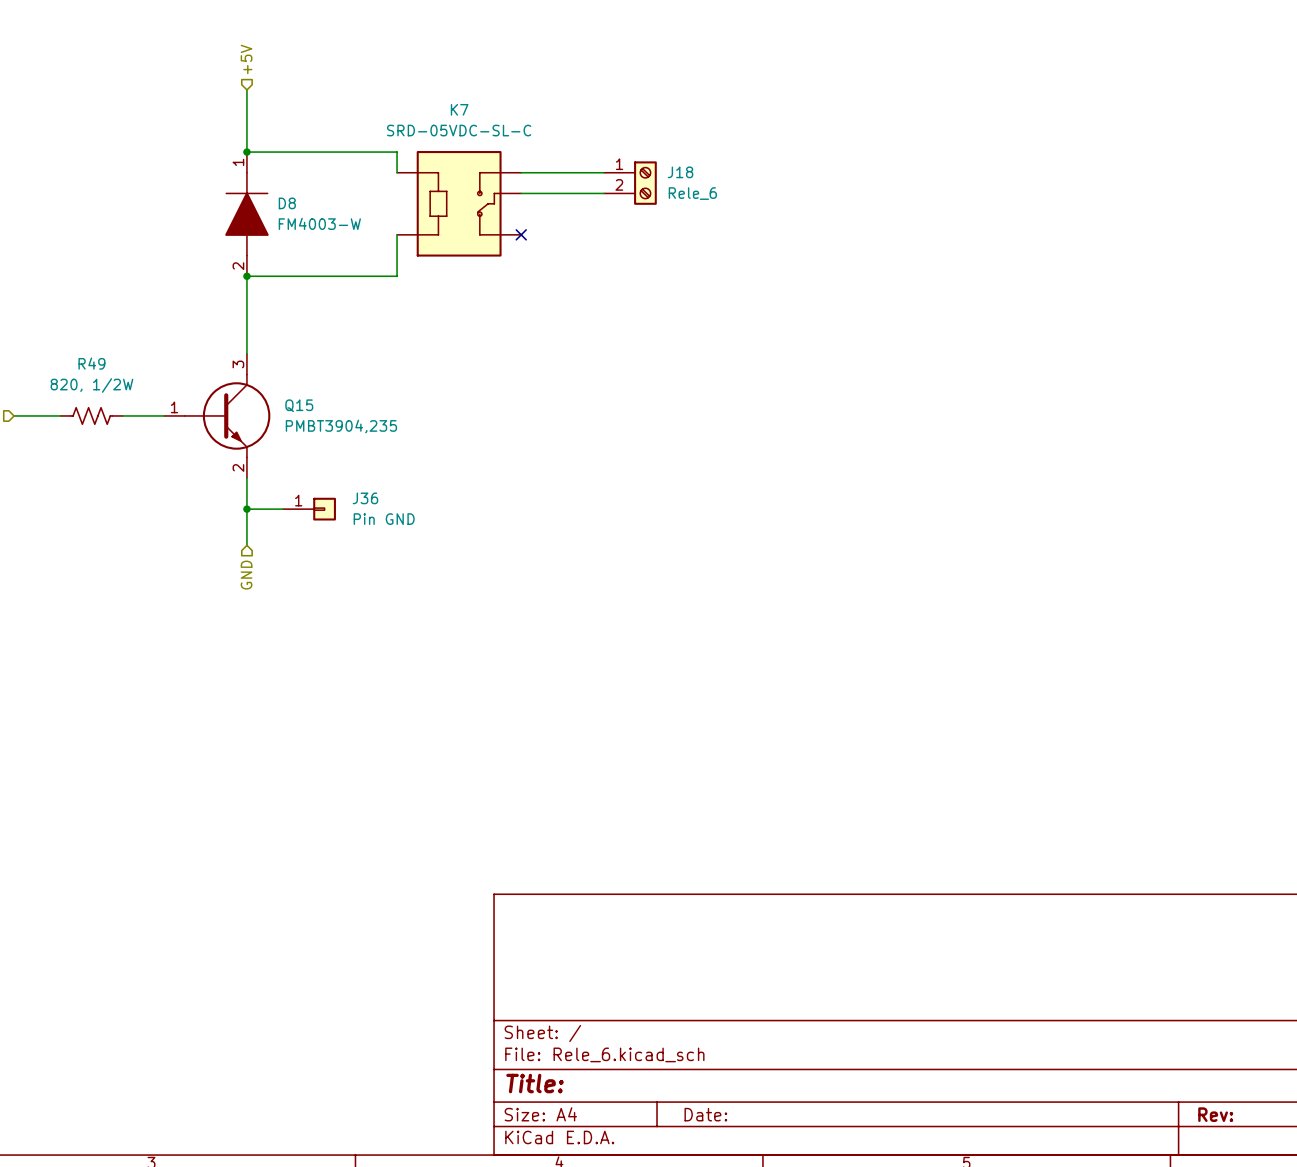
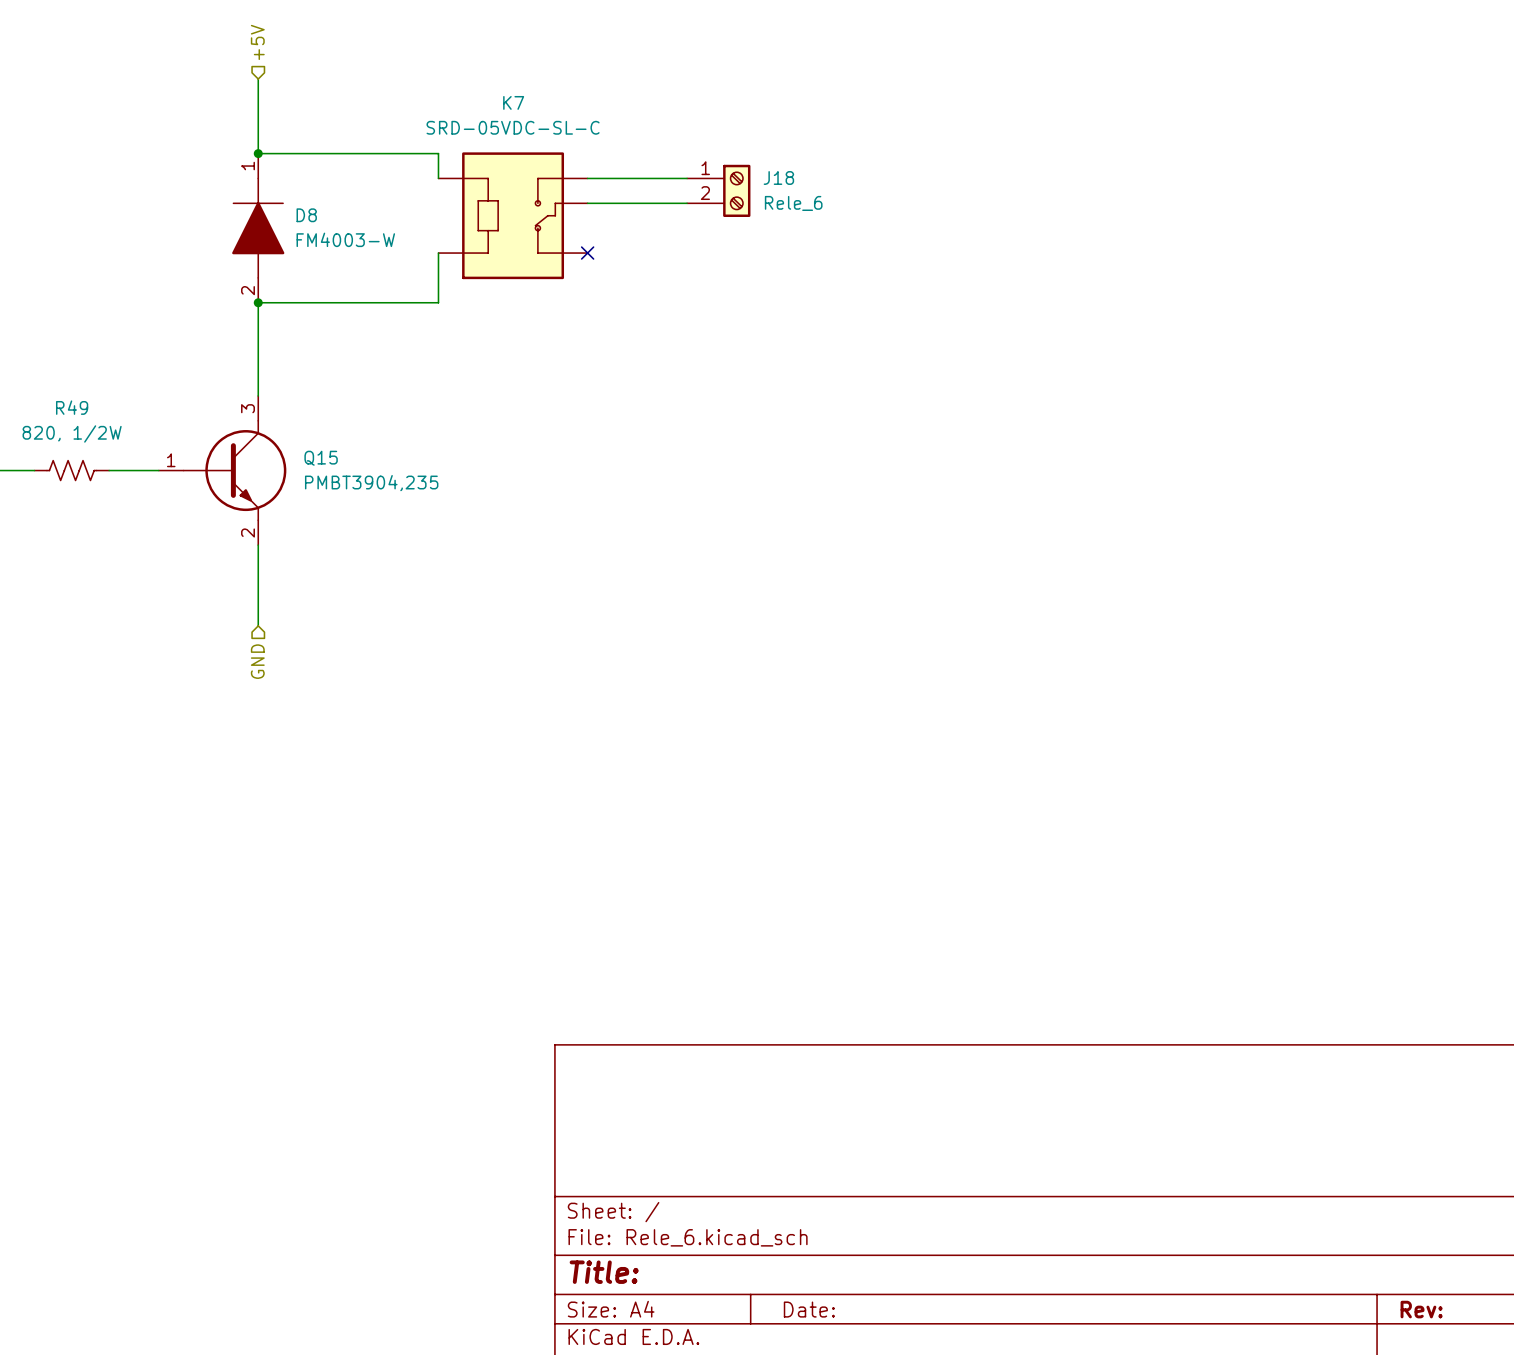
wire: (246, 509) (283, 509) -> none
junction: (246, 509) -> none
J36: Pin GND (309, 509) -> none

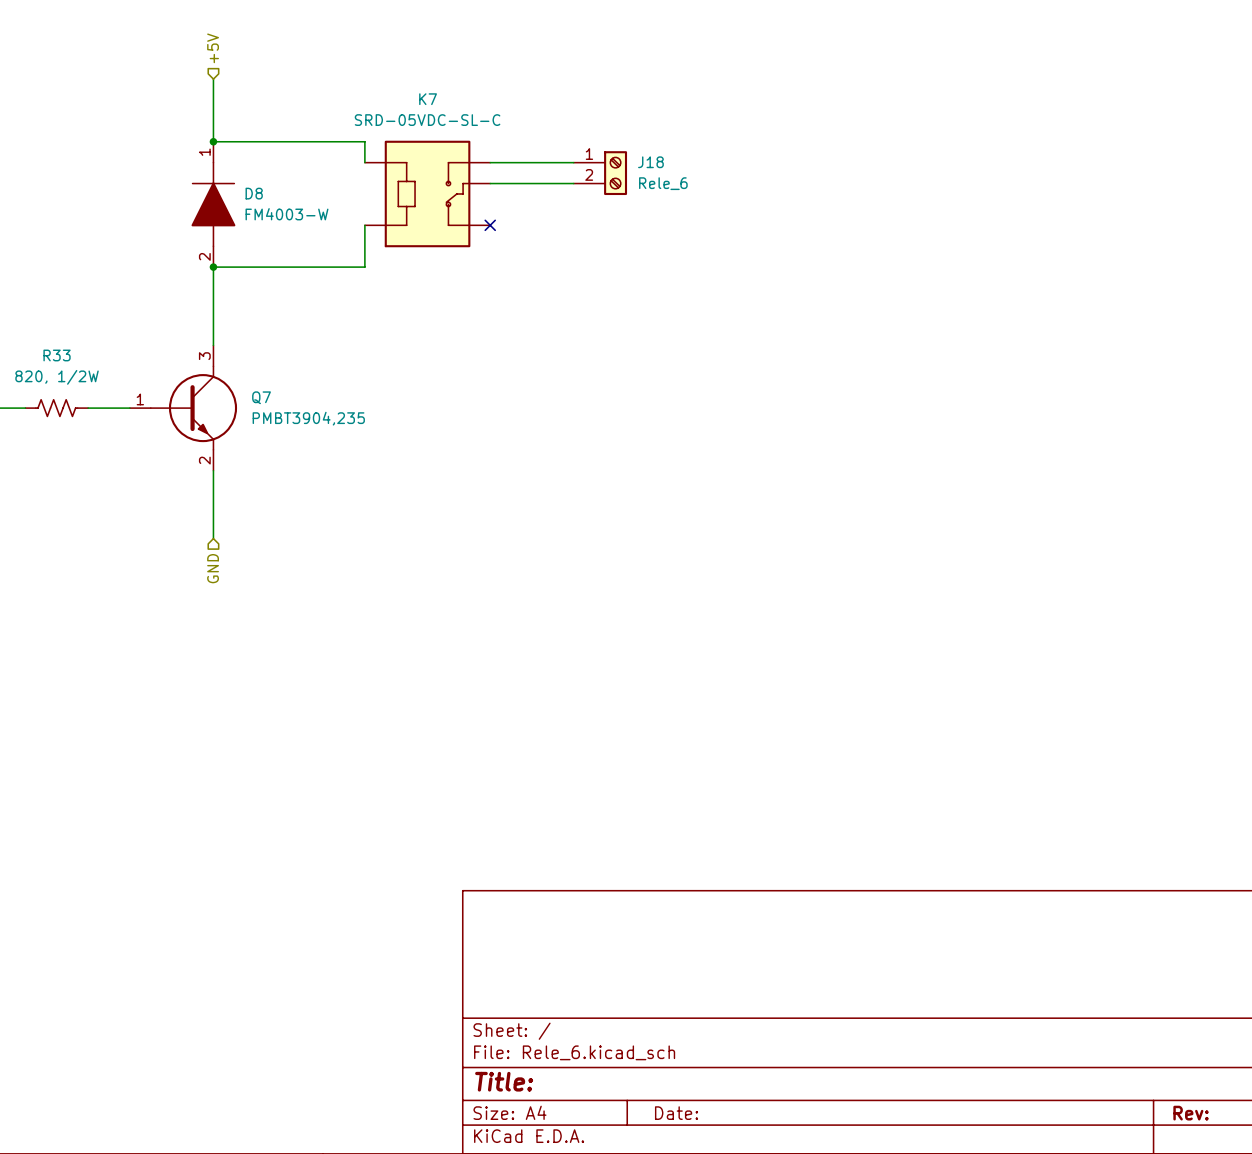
R49 name: R49 (72, 407) -> R33 (57, 355)
Q15 name: Q15 (321, 458) -> Q7 (261, 397)

